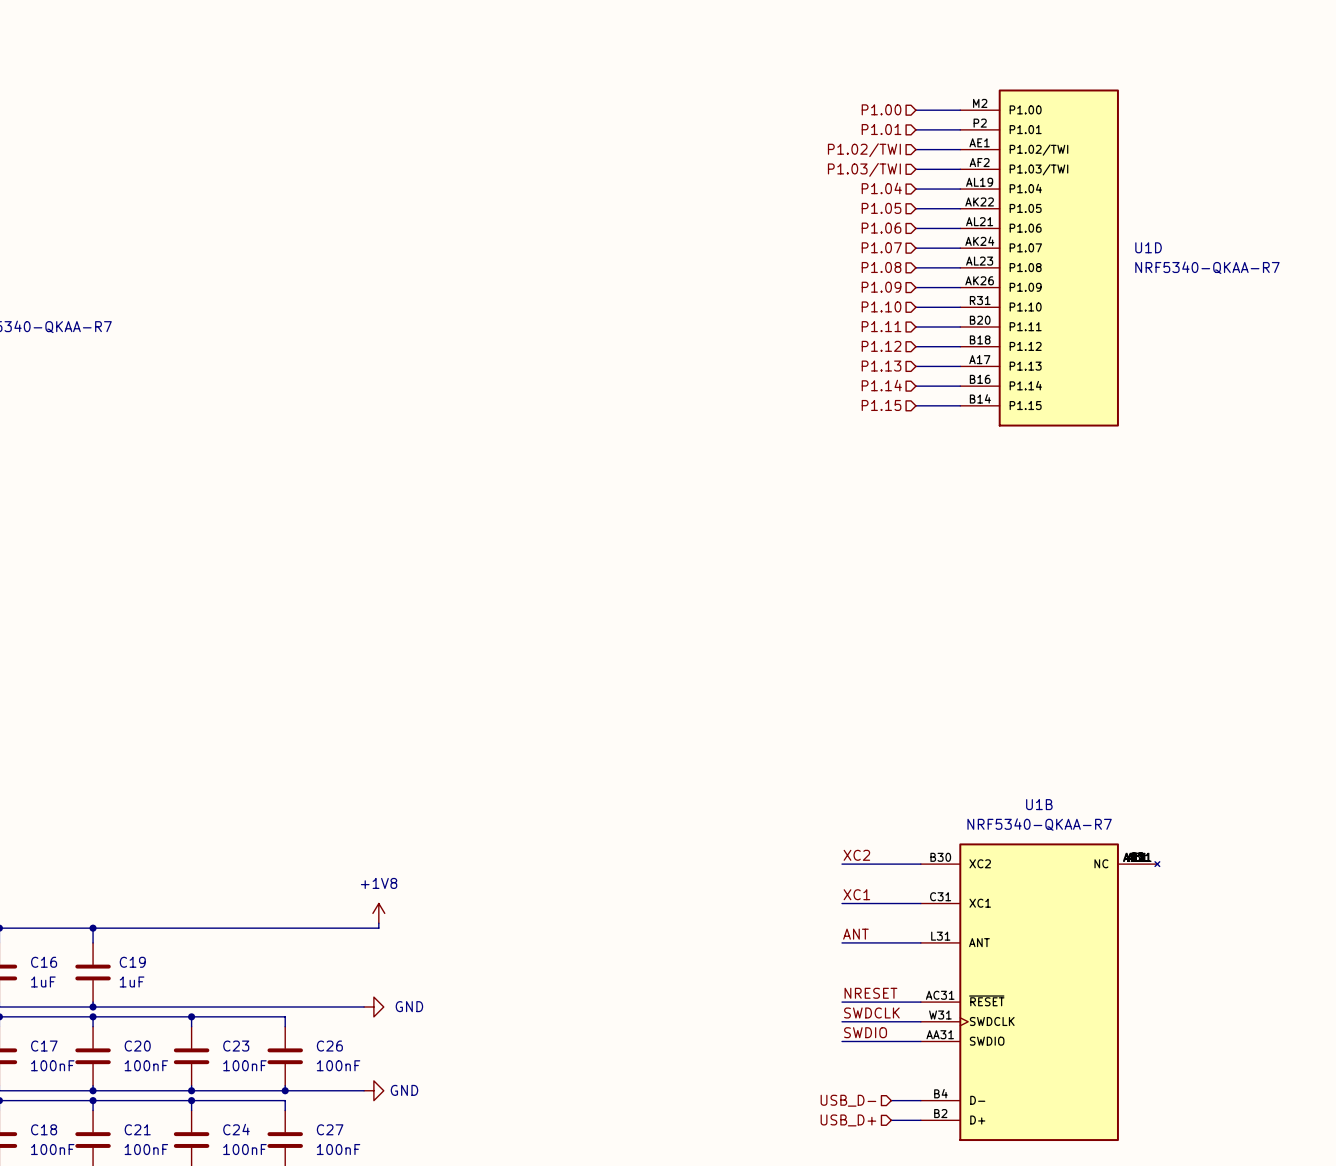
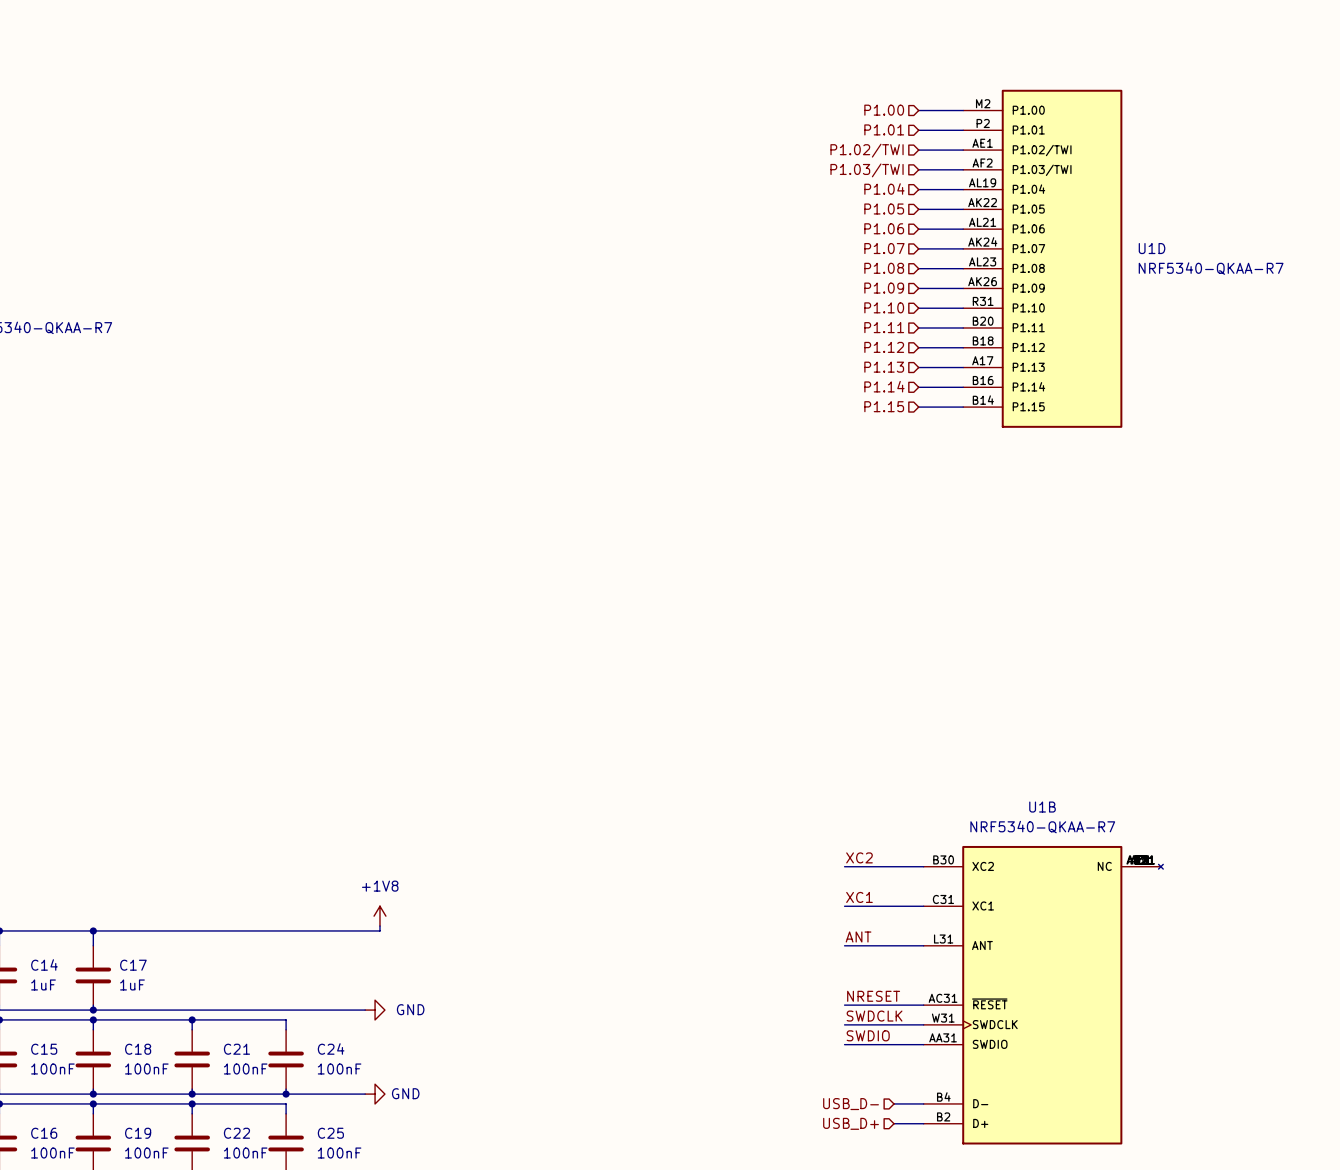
C16 name: C16 (44, 962) -> C14 (44, 964)
C19 name: C19 (132, 962) -> C17 (133, 965)
C17 name: C17 (44, 1046) -> C15 (44, 1049)
C20 name: C20 (137, 1046) -> C18 (138, 1049)
C23 name: C23 (236, 1046) -> C21 (236, 1049)
C26 name: C26 (329, 1046) -> C24 (331, 1048)
C18 name: C18 (44, 1129) -> C16 (44, 1133)
C21 name: C21 (137, 1129) -> C19 (138, 1133)
C24 name: C24 (236, 1129) -> C22 (236, 1133)
C27 name: C27 (330, 1129) -> C25 (330, 1133)

